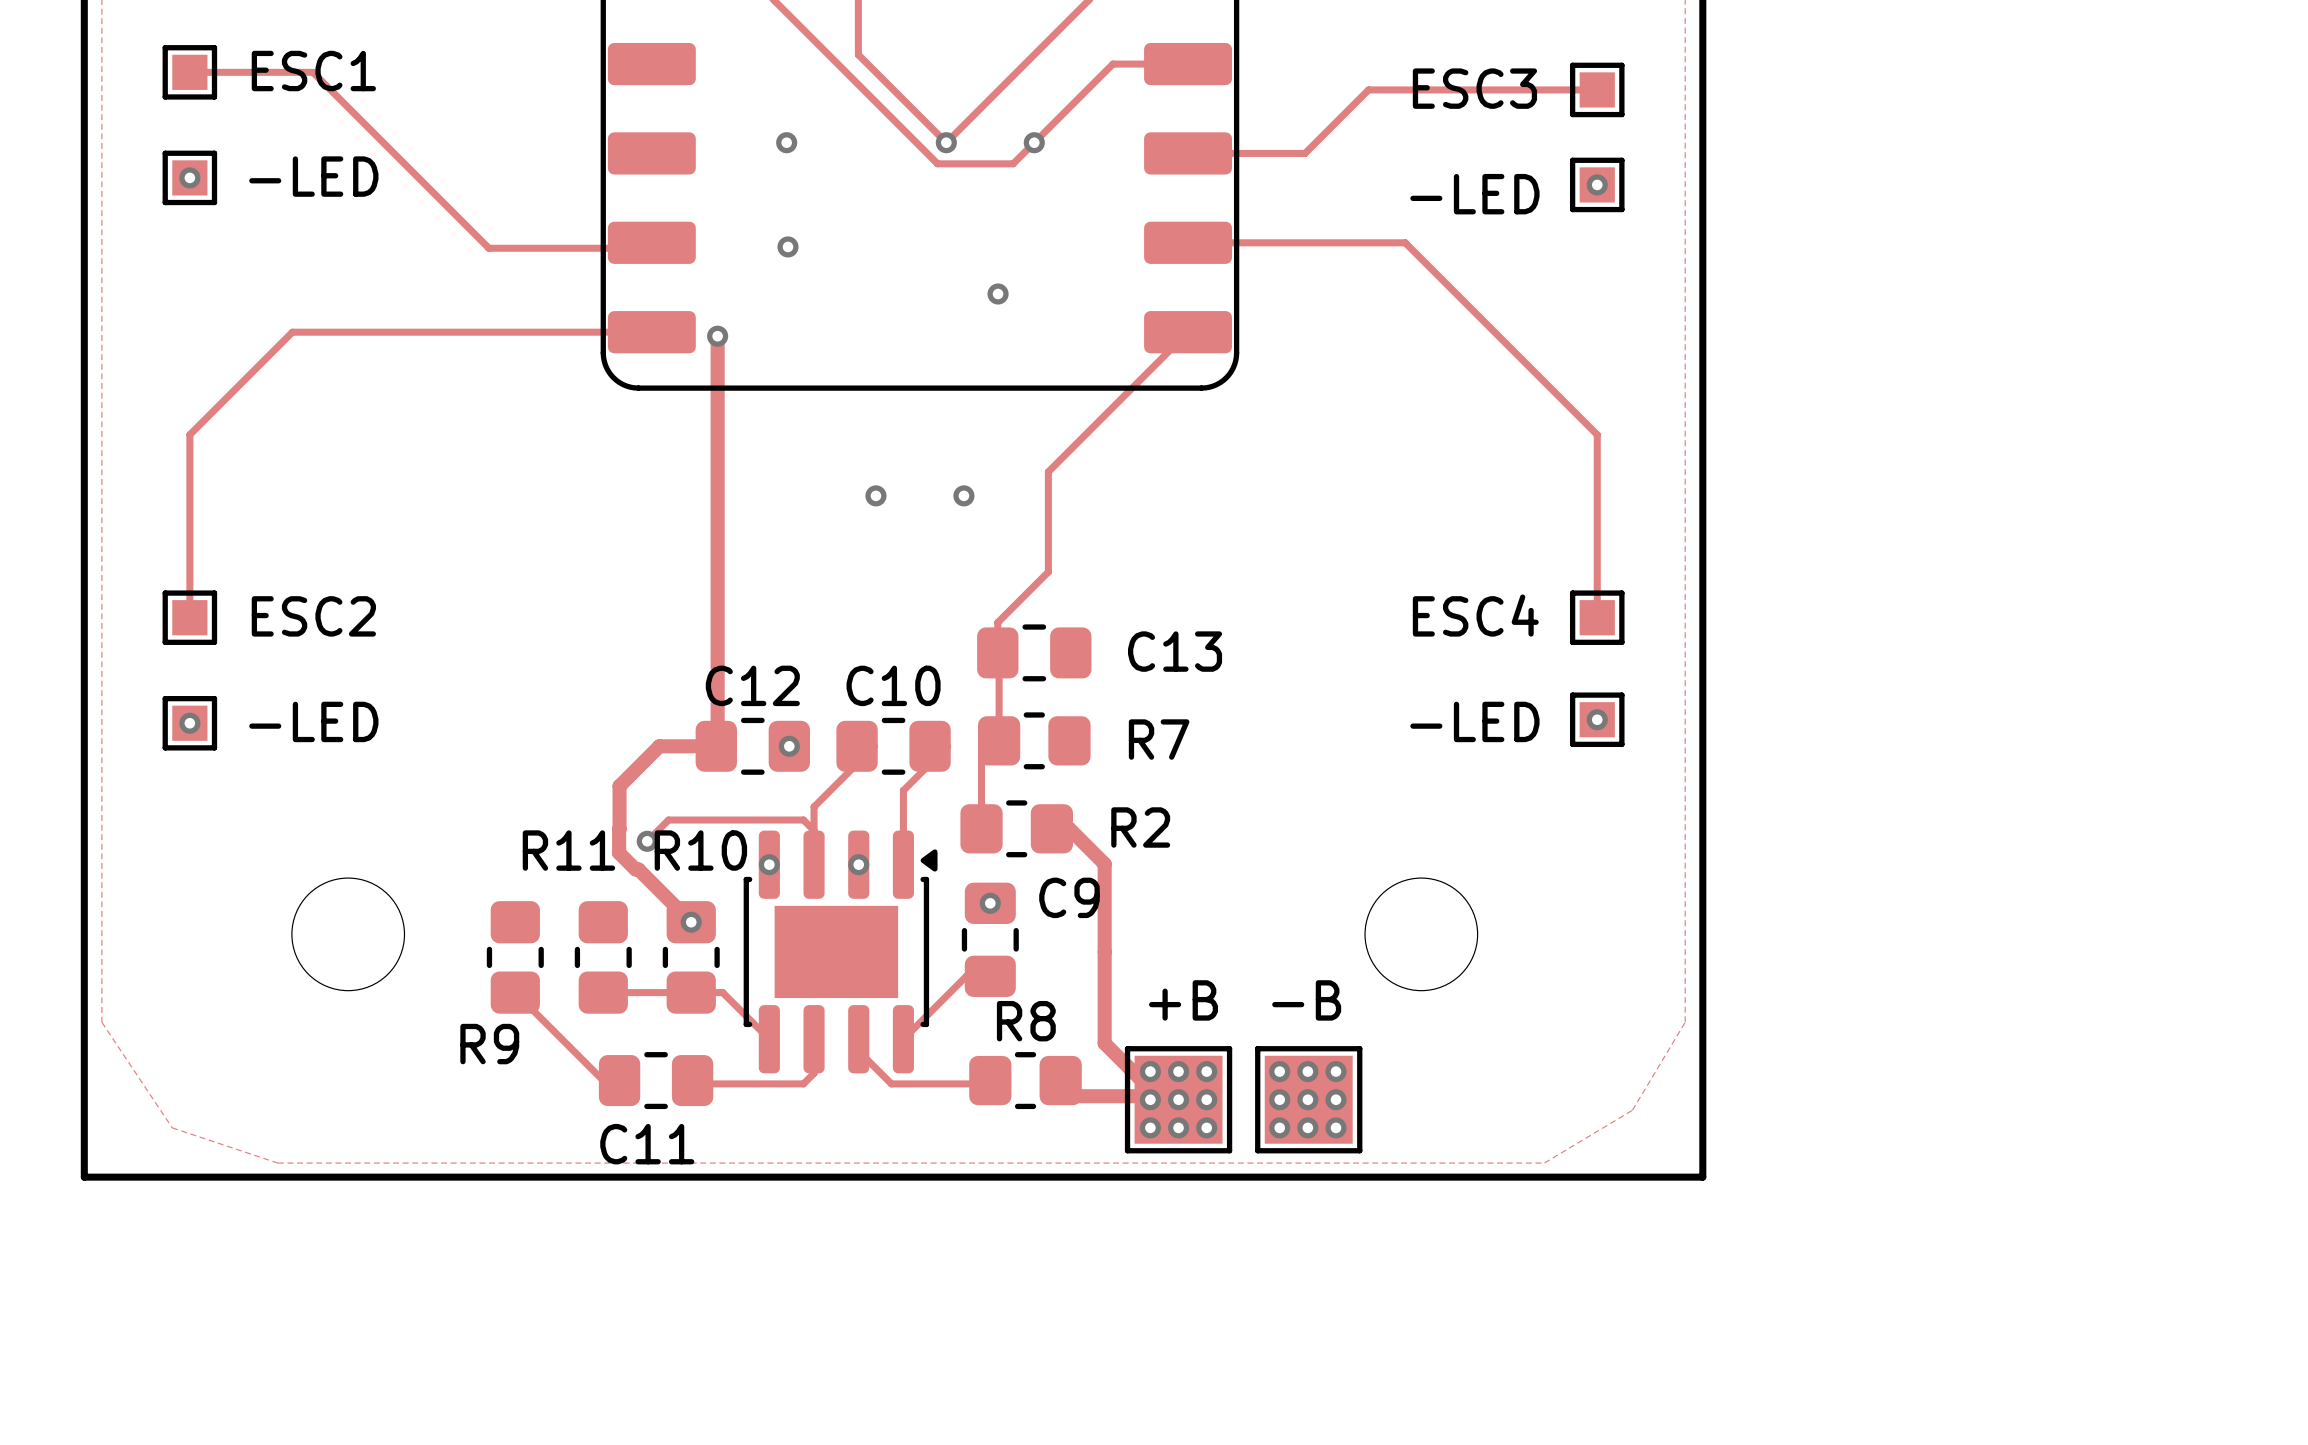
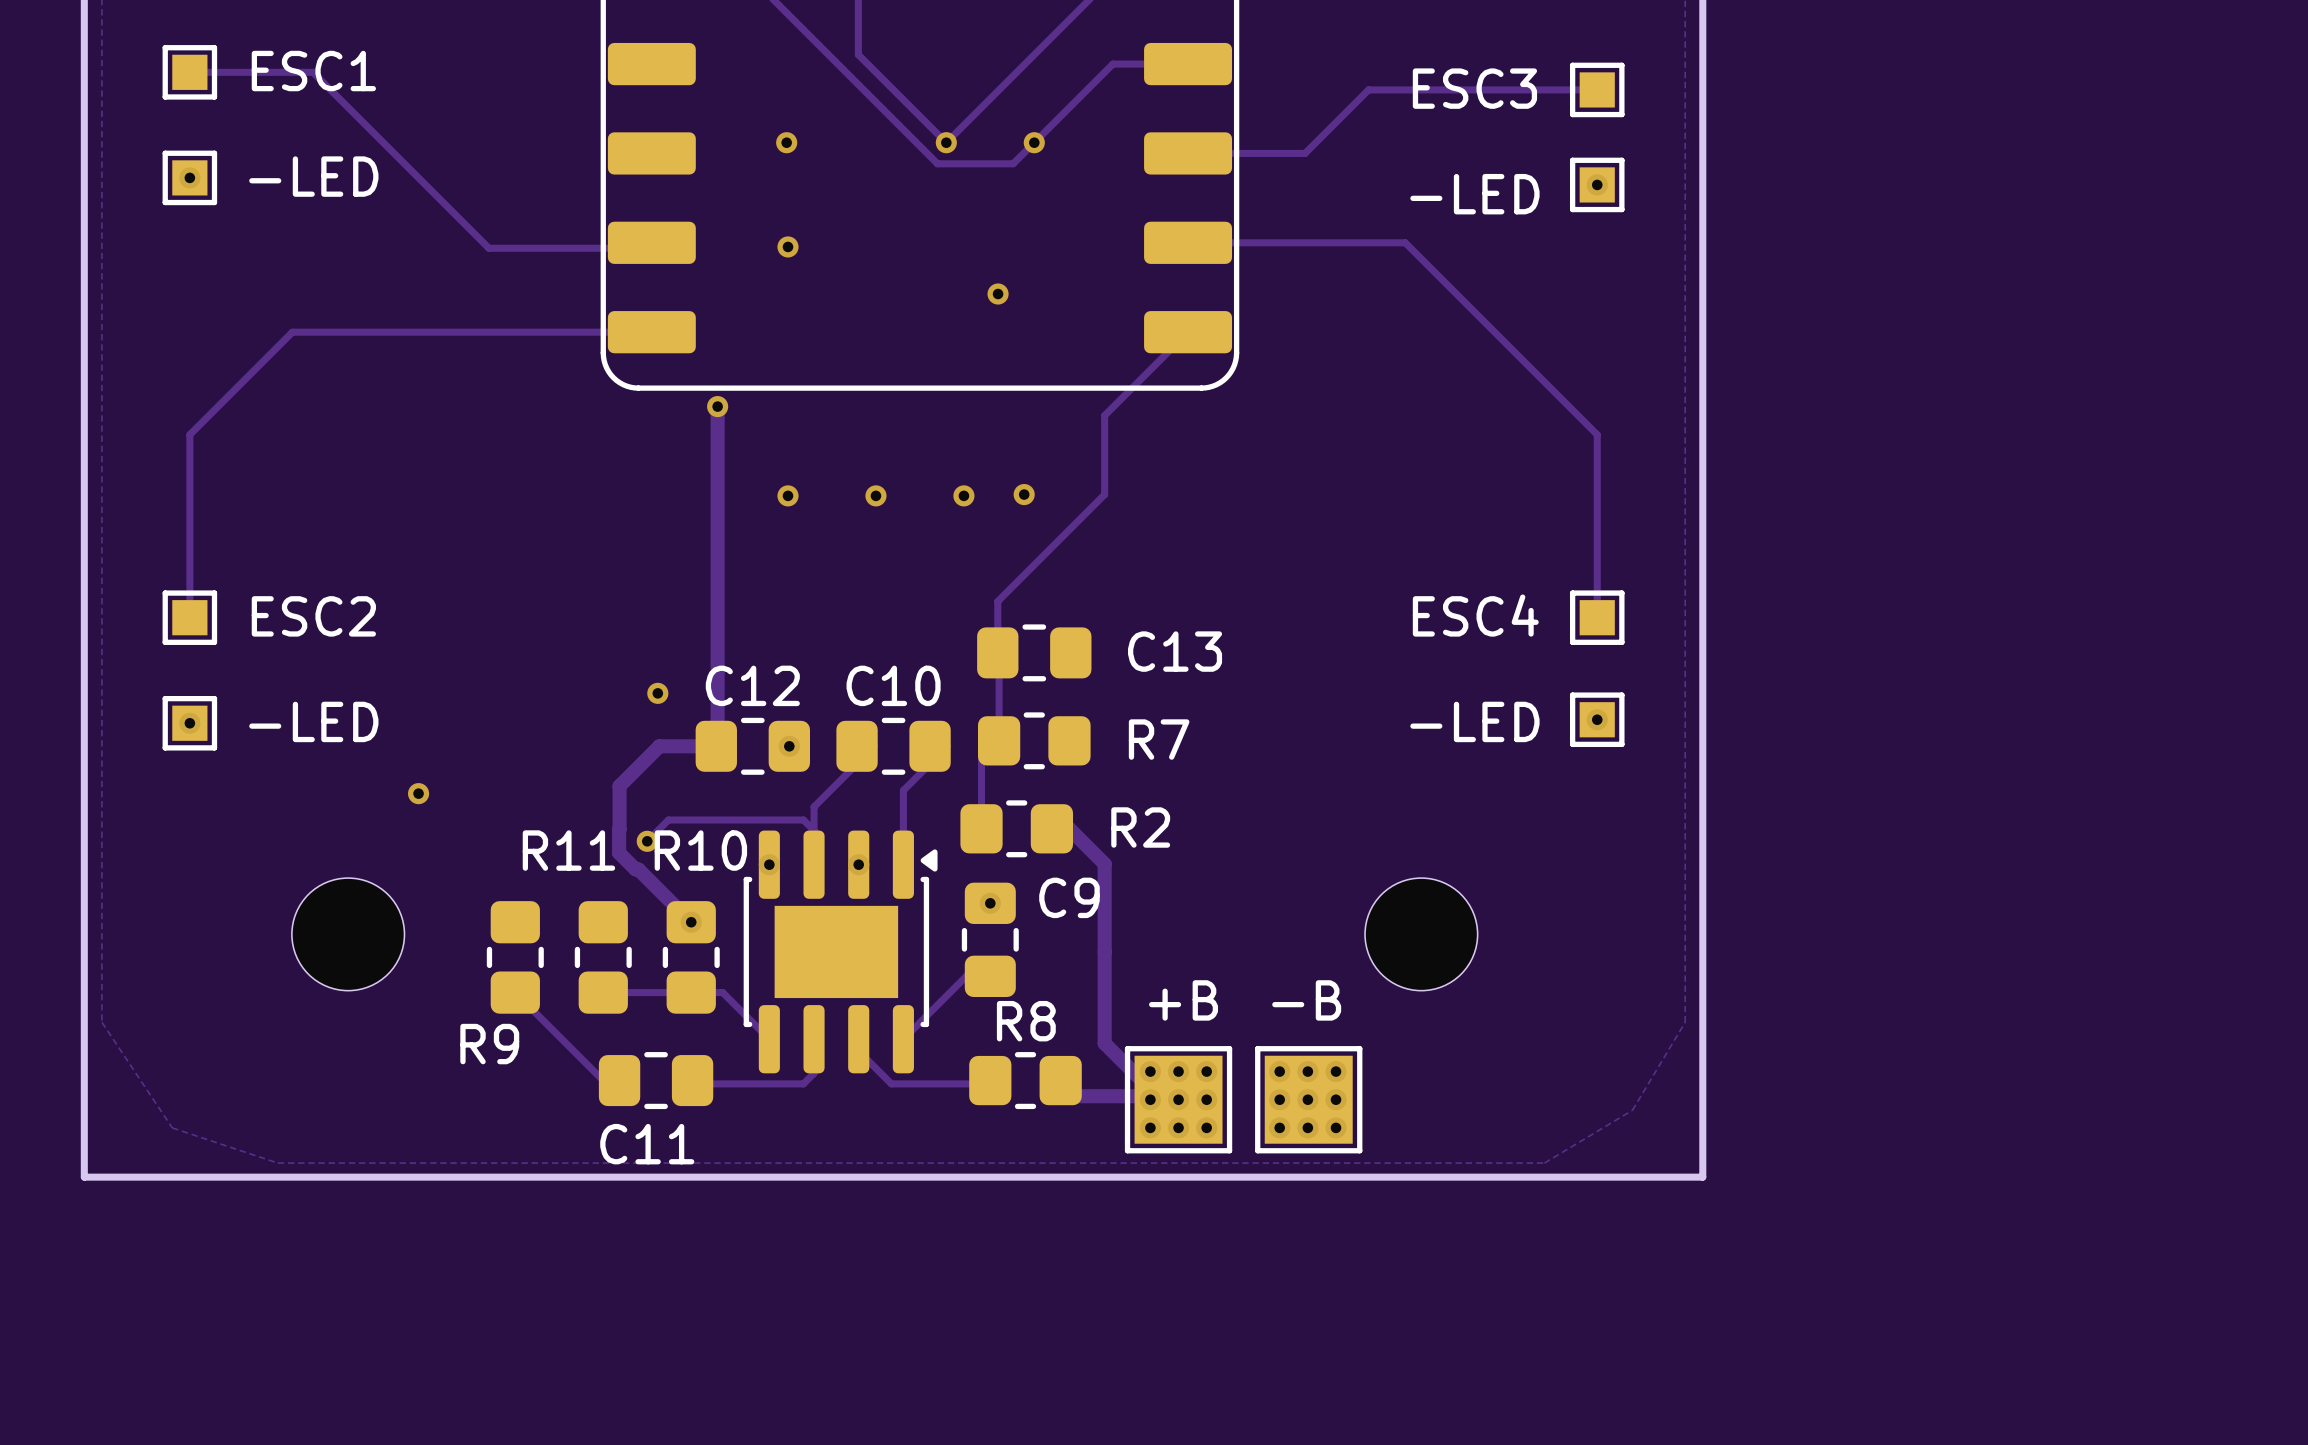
track: (717, 336) (717, 406) -> none
via position: (717, 336) -> (717, 406)
track: (1104, 415) (1048, 471) (1048, 571) (997, 622) -> (1104, 415) (1104, 494) (997, 601) (997, 622)
via: none -> (1024, 494)
via: none -> (788, 495)
via: none -> (657, 693)
via: none -> (418, 793)

